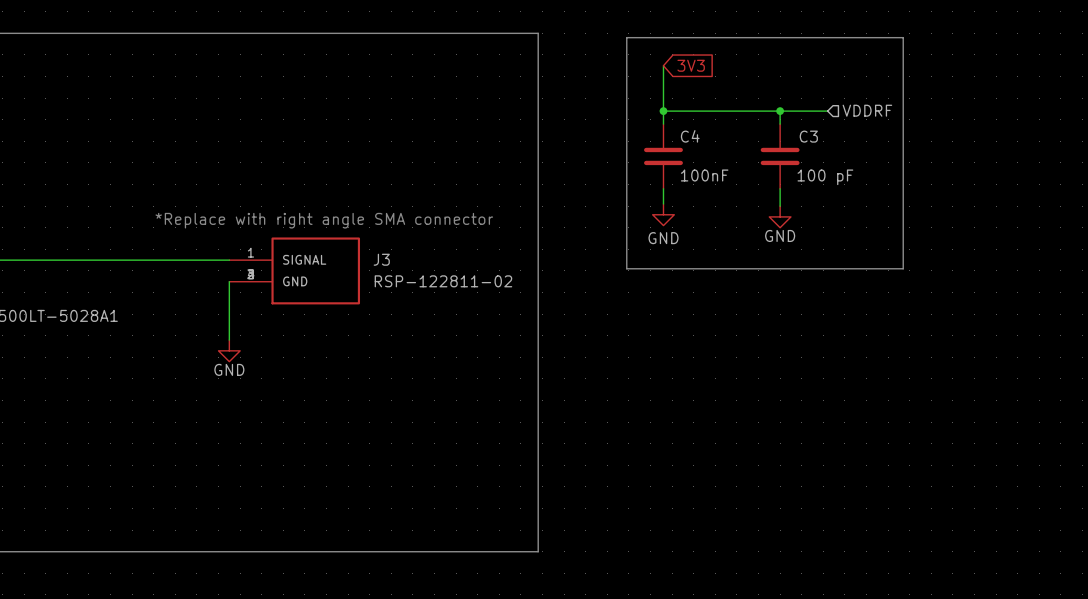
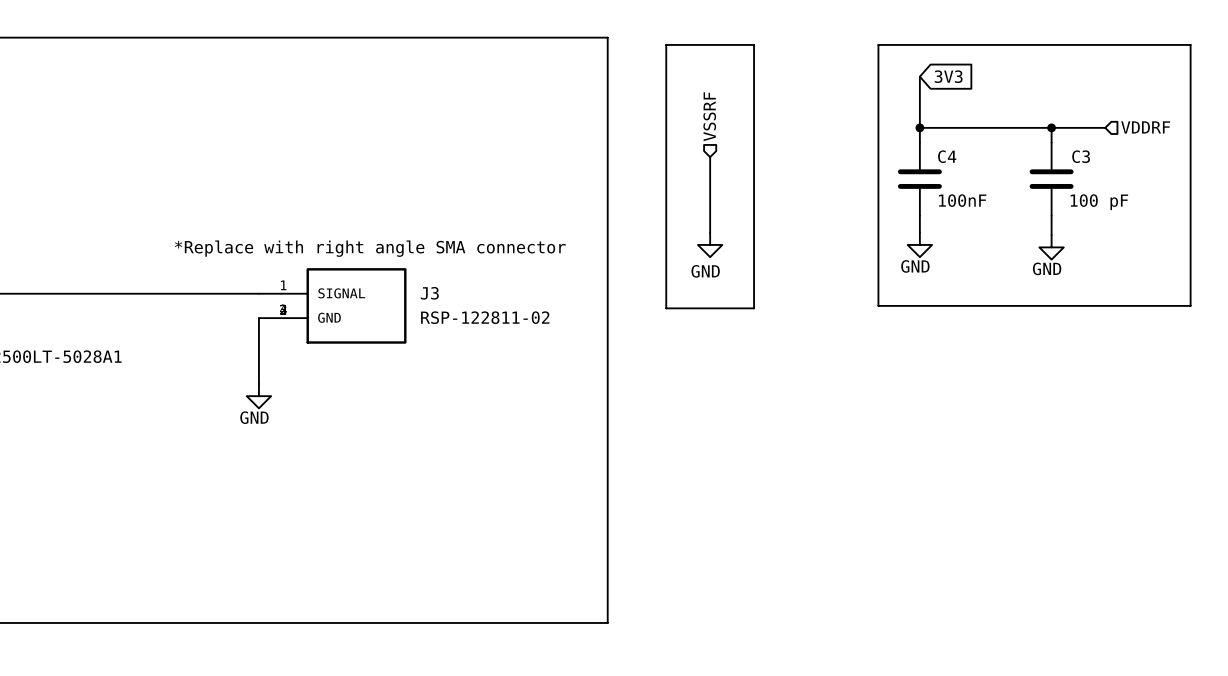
line: (626, 37) (903, 37) (903, 268) (626, 268) (626, 37) -> (878, 44) (1190, 44) (1190, 305) (878, 305) (878, 44)
line: none -> (666, 44) (754, 44) (754, 308) (666, 308) (666, 44)
wire: (663, 65) (663, 124) -> (919, 76) (919, 142)
global label position: 3V3 (691, 65) -> 3V3 (948, 76)
hierarchical label: none -> VSSRF (709, 116)
hierarchical label position: VDDRF (867, 110) -> VDDRF (1145, 127)
wire: (663, 111) (827, 111) -> (919, 127) (1105, 127)
junction: (663, 111) -> none
wire: (780, 111) (780, 124) -> (1051, 127) (1051, 142)
junction position: (780, 111) -> (919, 127)
junction: none -> (1051, 127)
wire: none -> (710, 157) (710, 232)
C4 position: (663, 156) -> (919, 179)
C3 position: (780, 156) -> (1051, 179)
wire: (663, 188) (663, 203) -> (919, 215) (919, 232)
wire: (780, 188) (780, 206) -> (1051, 215) (1051, 235)
power symbol position: GND (663, 214) -> GND (710, 244)
power symbol position: GND (780, 216) -> GND (919, 244)
power symbol: none -> GND (1051, 247)

